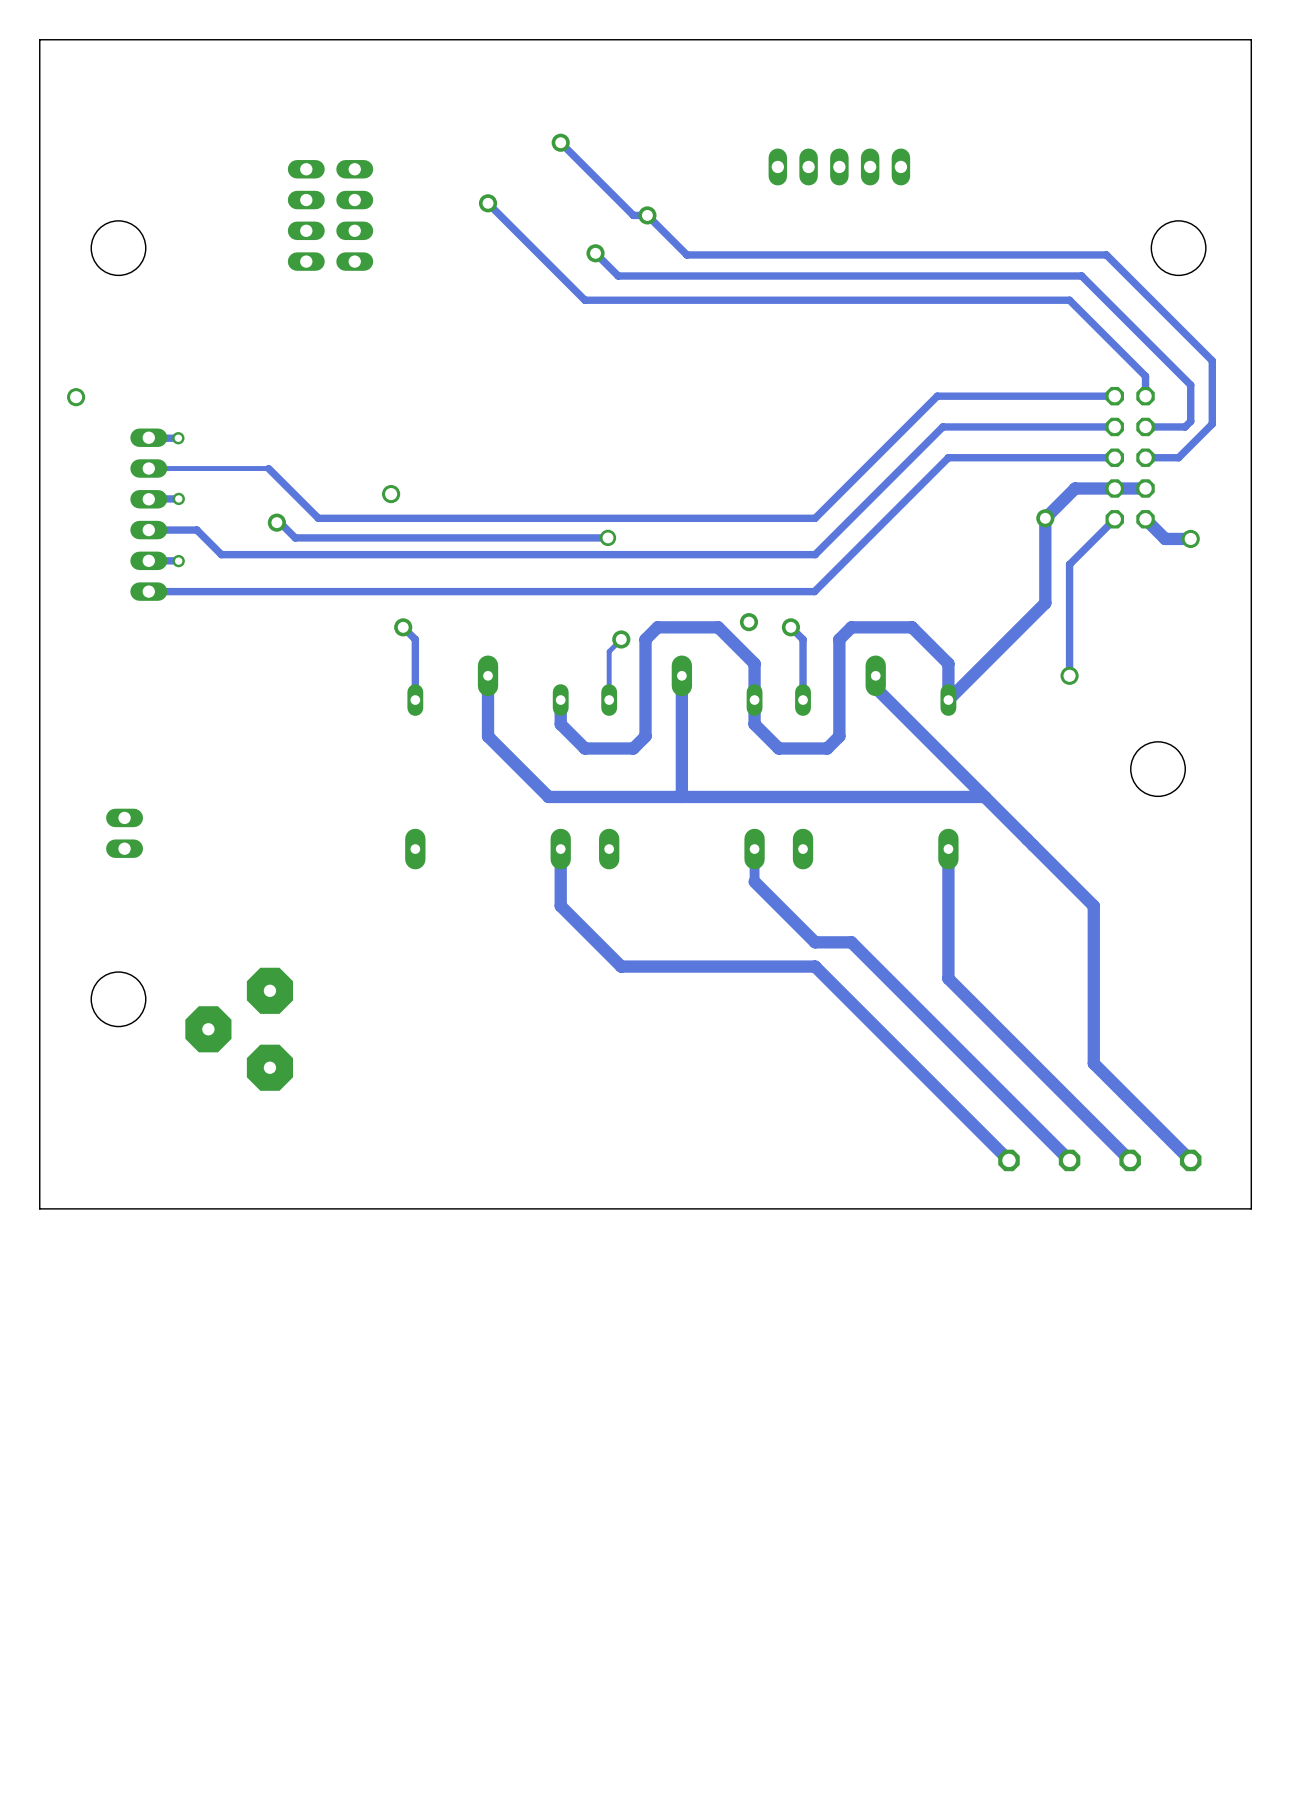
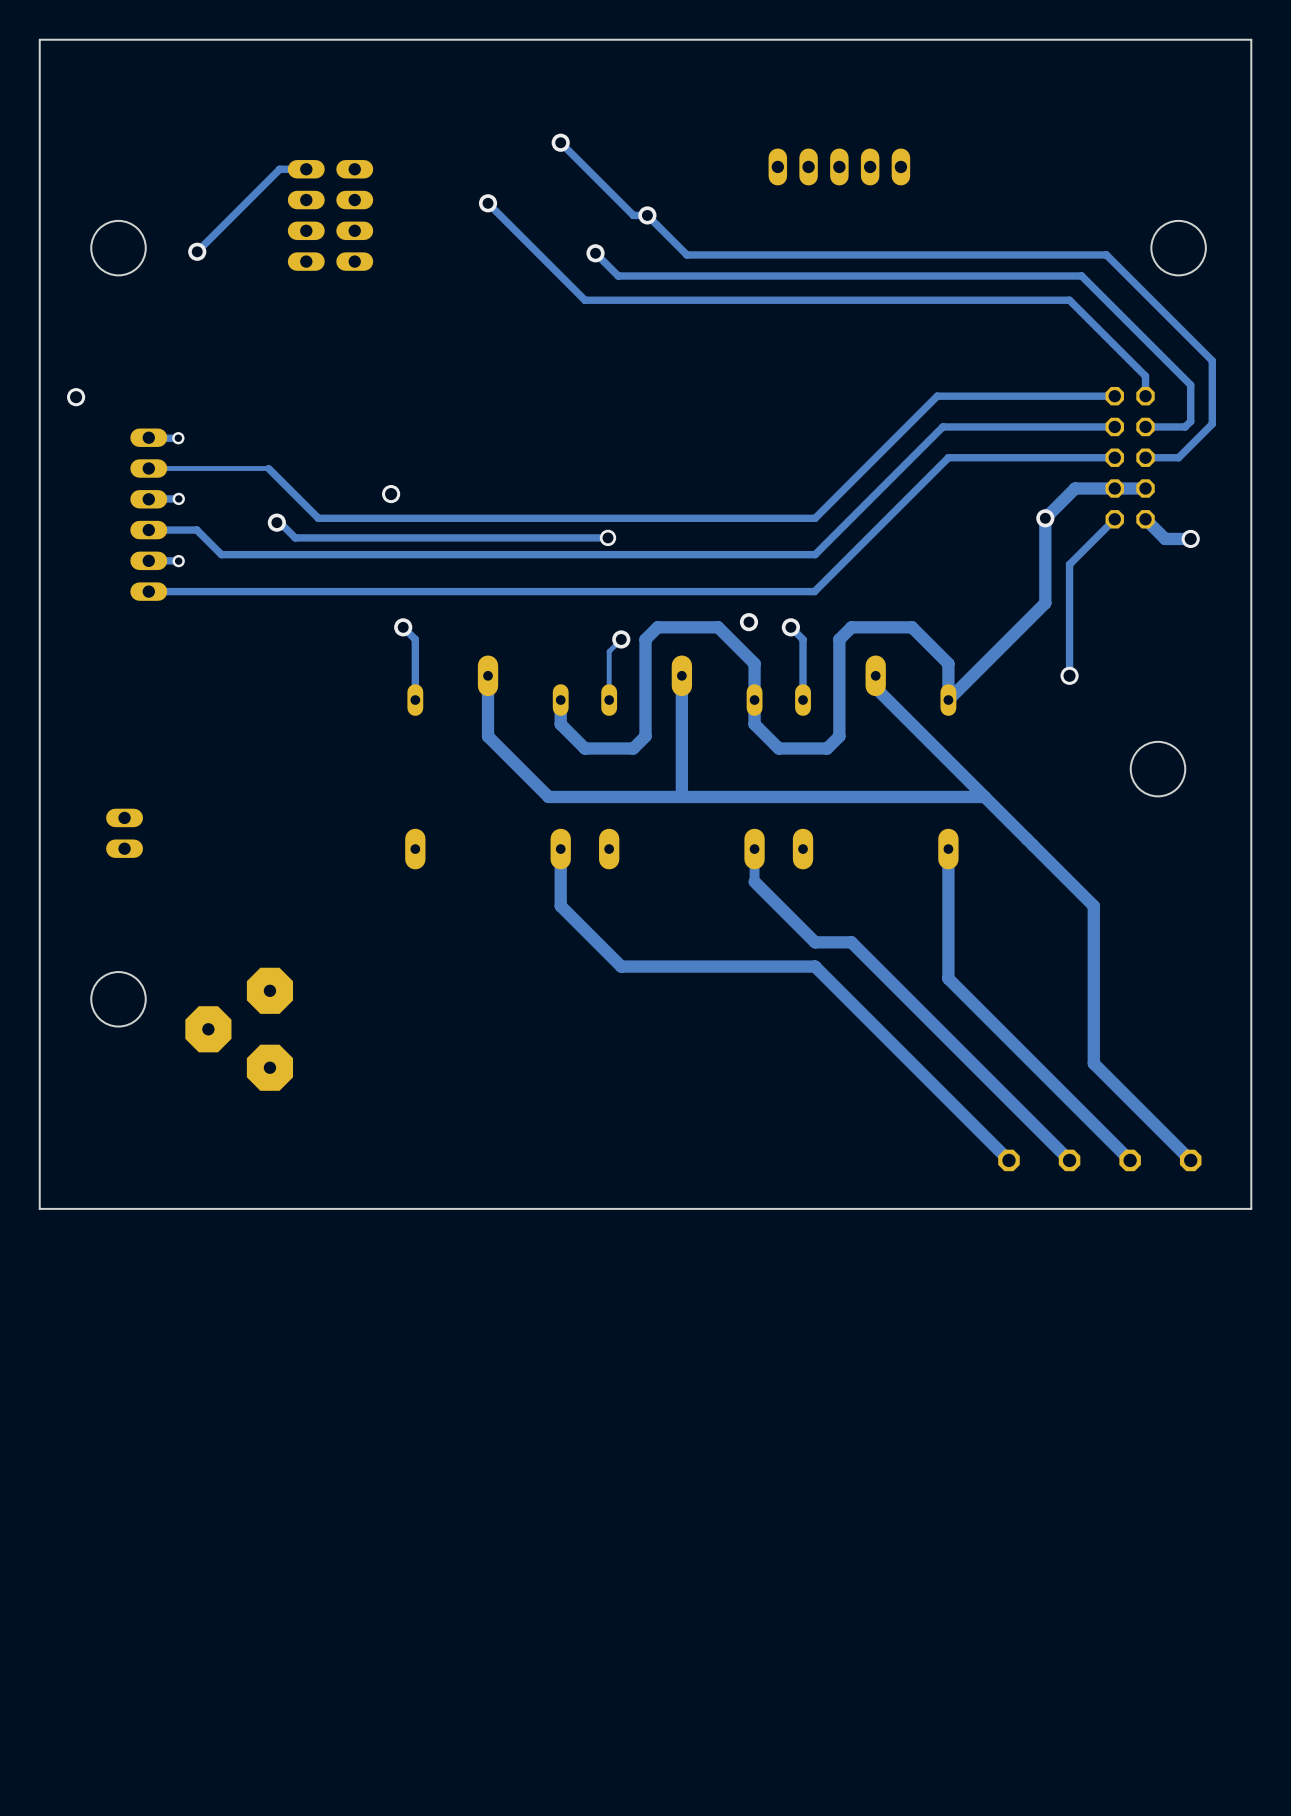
track: none -> (306, 169) (279, 169) (197, 251)
via: none -> (197, 251)

